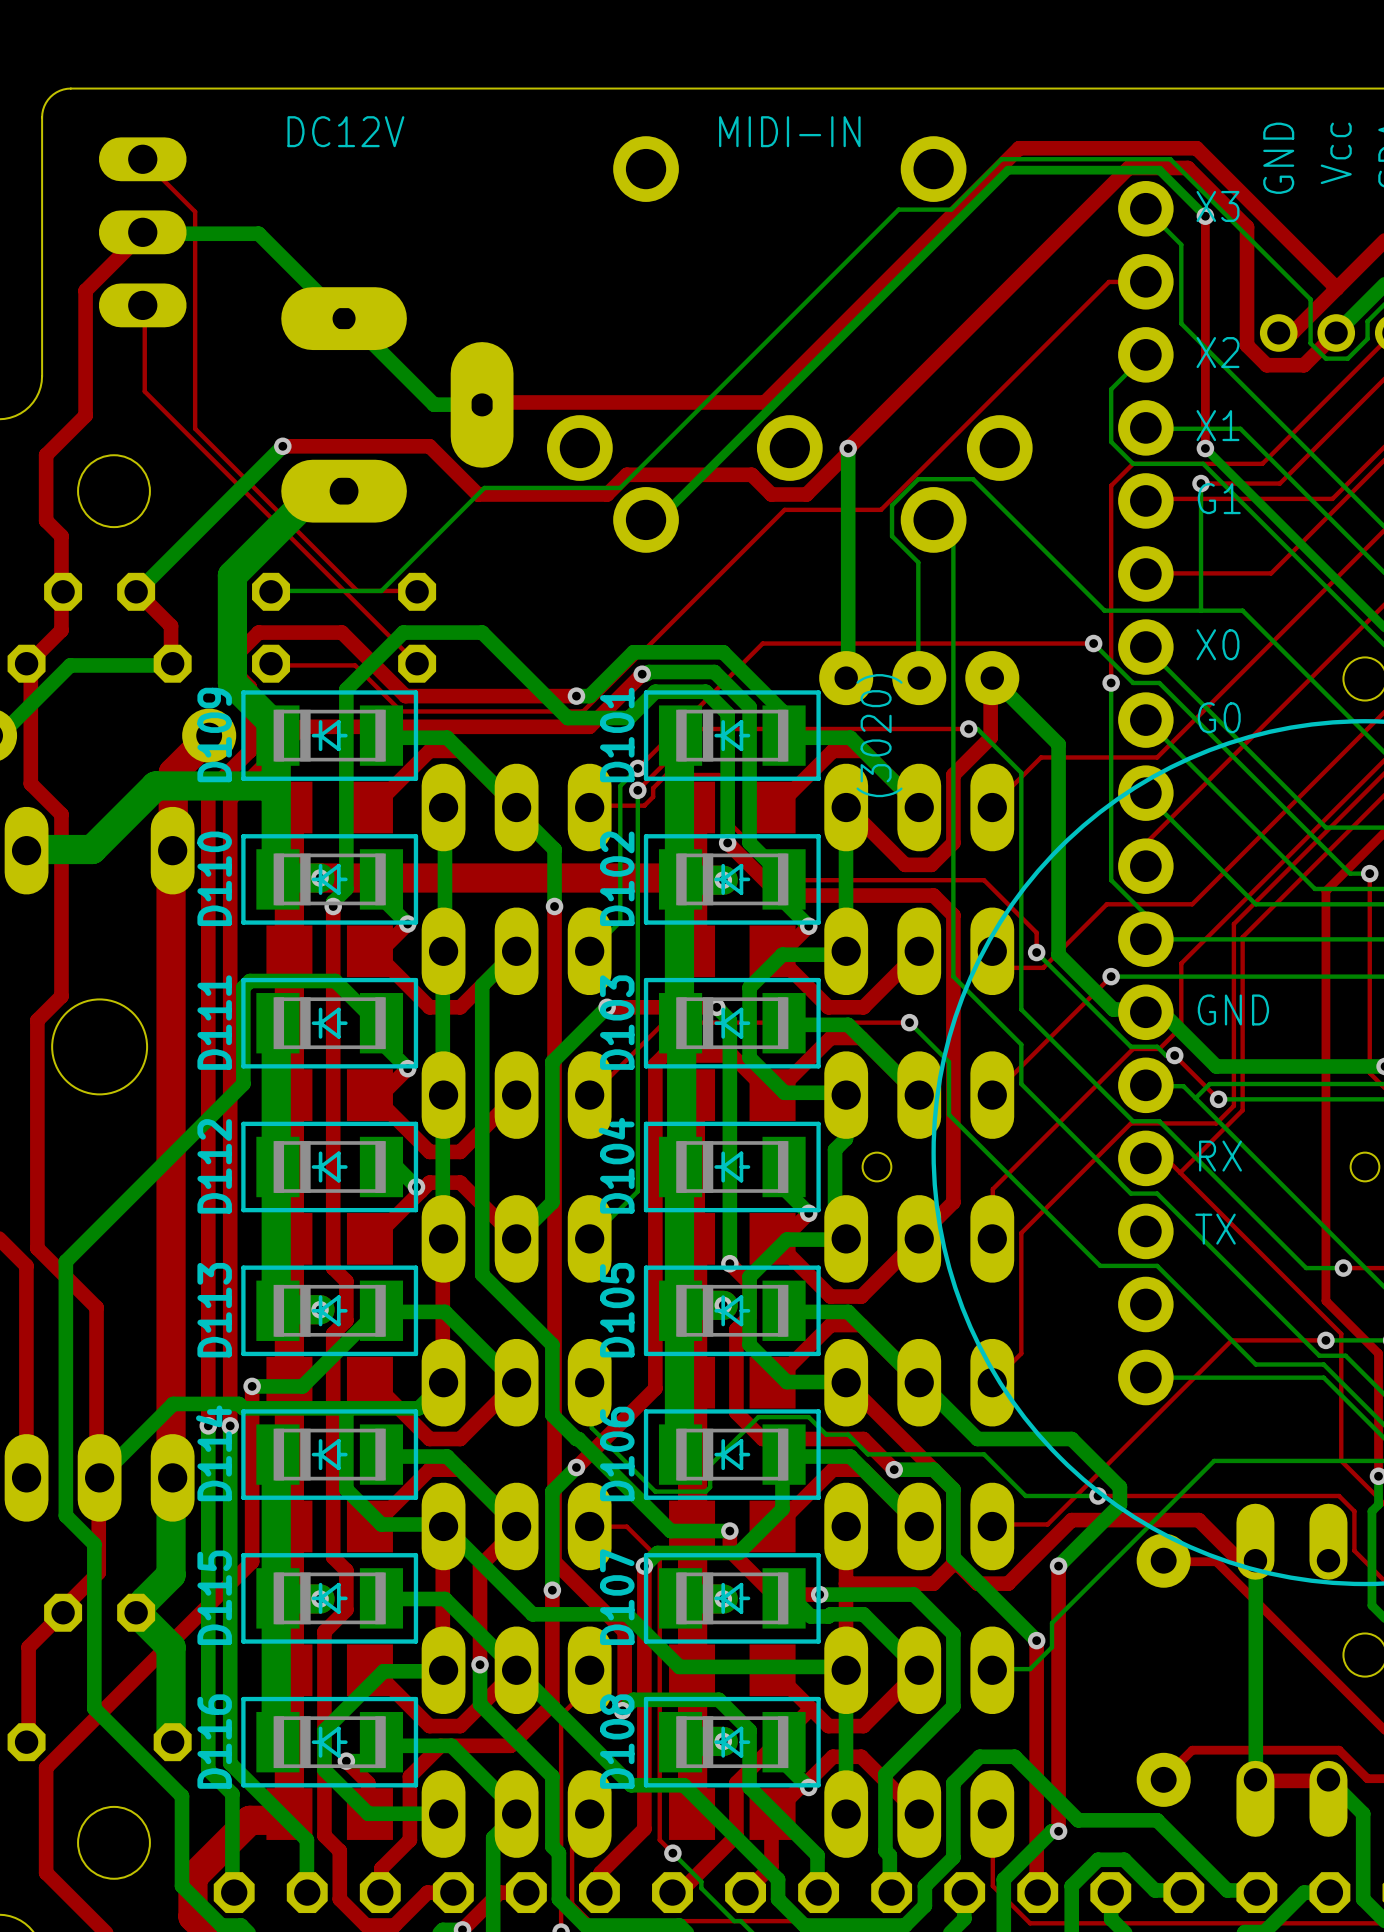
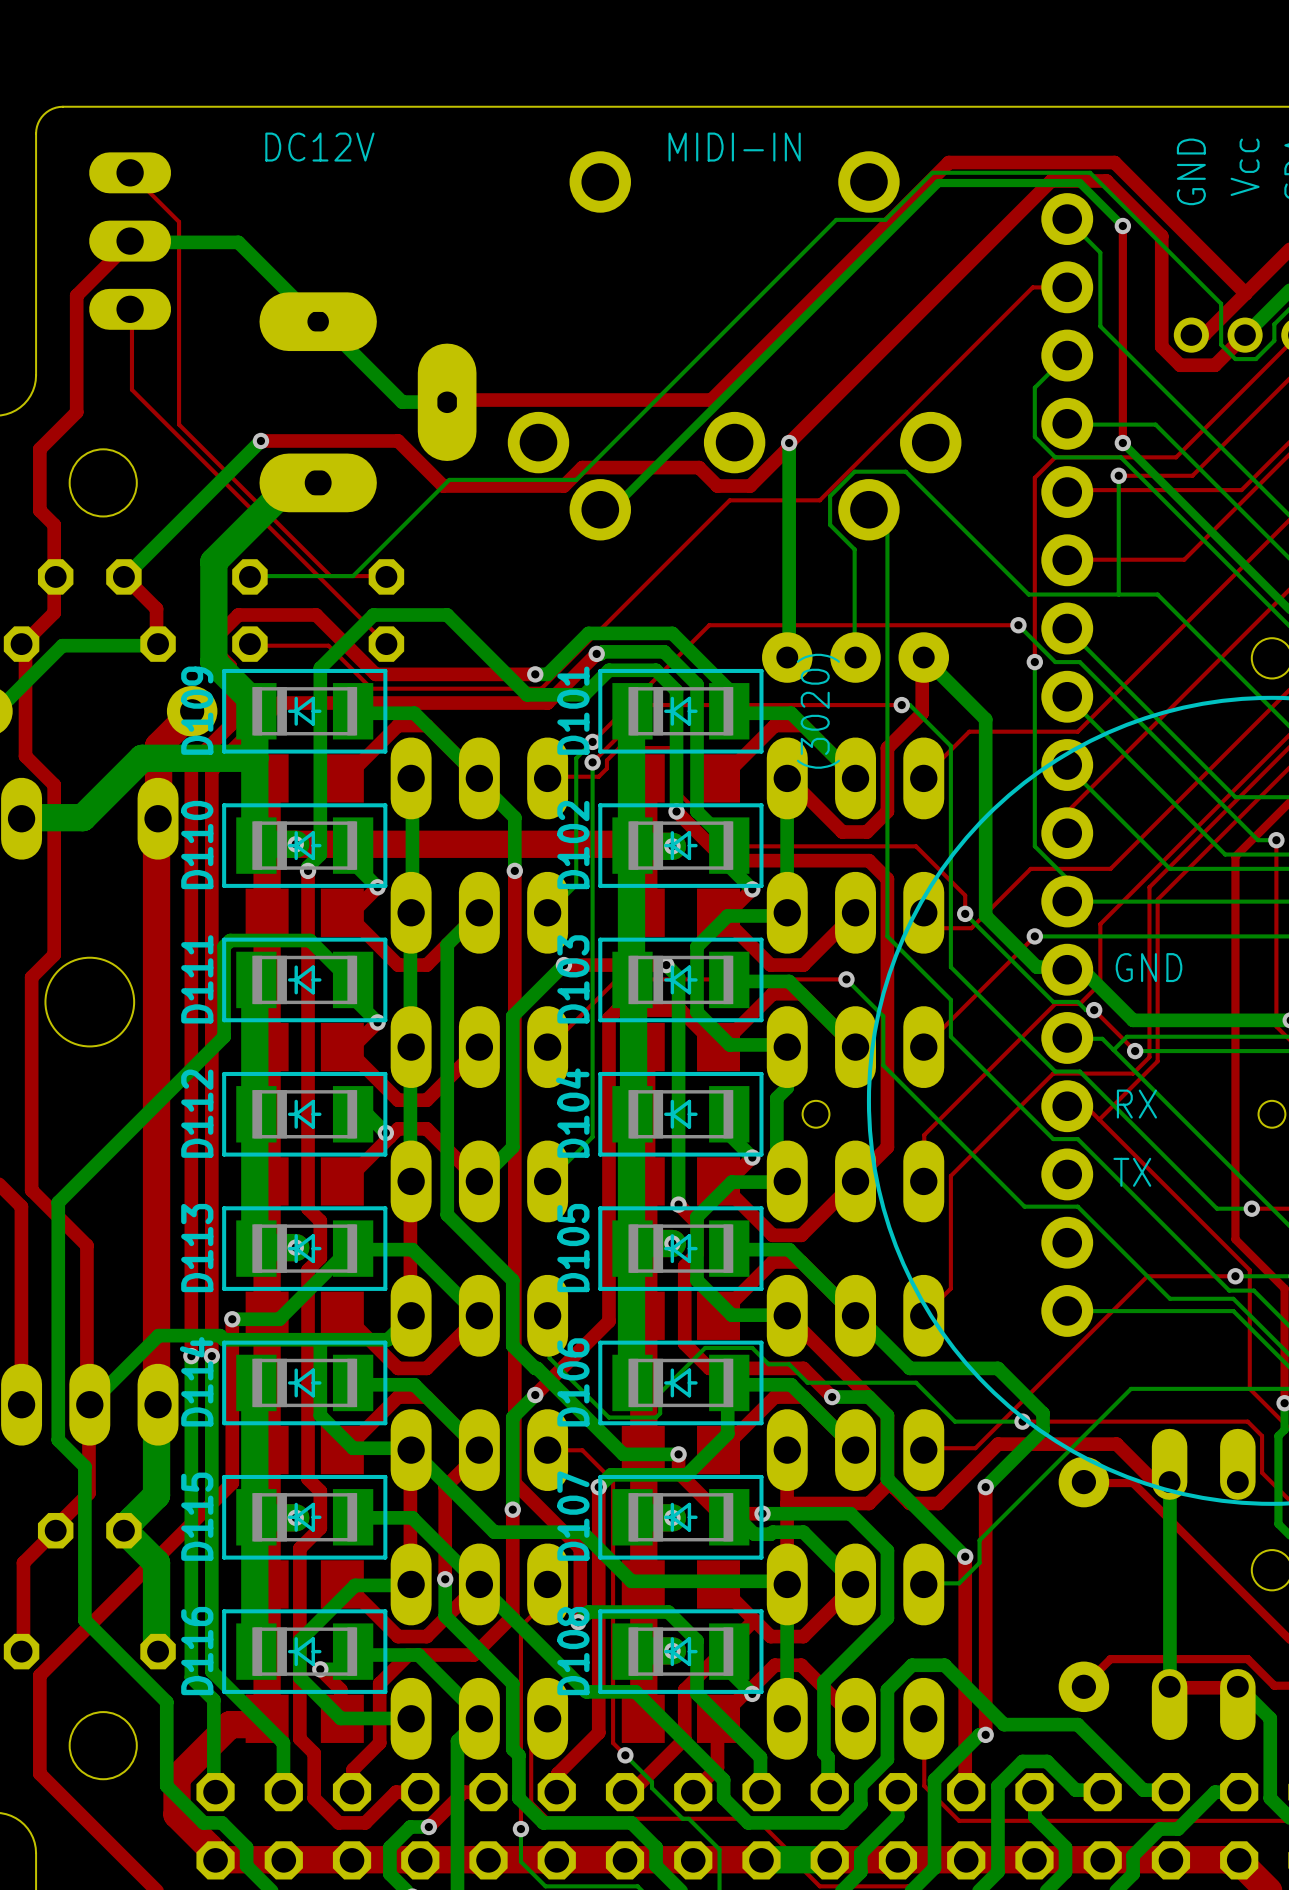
text: X3 (1218, 206) -> none
text: X2 (1218, 352) -> none
text: X1 (1218, 425) -> none
text: G1 (1219, 498) -> none
text: X0 (1218, 644) -> none
text: G0 (1219, 717) -> none

